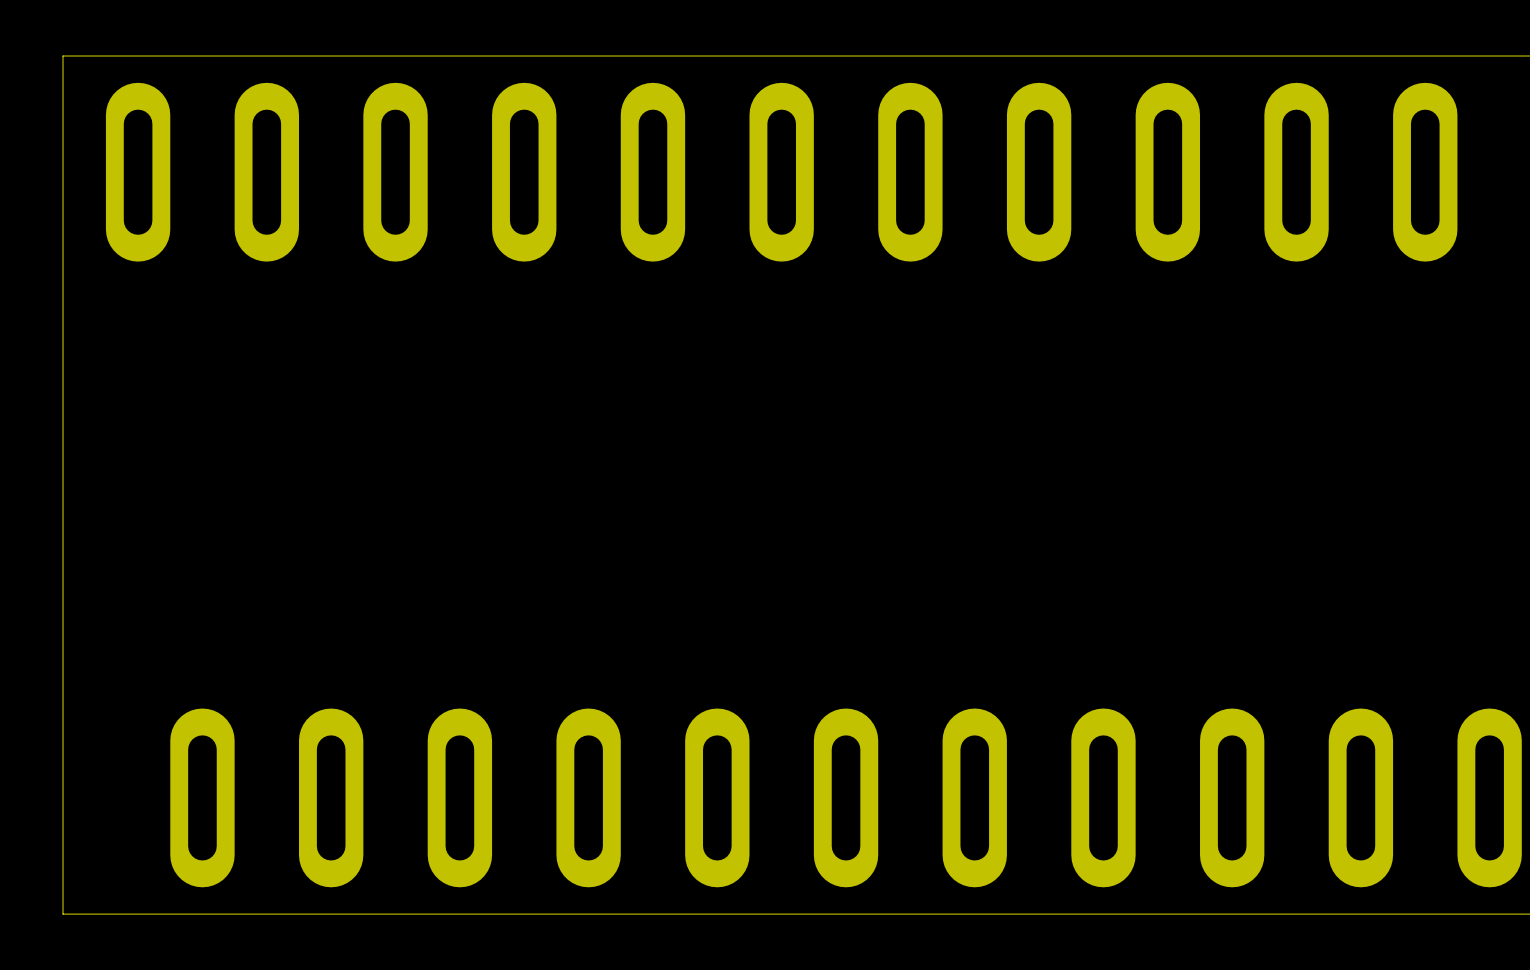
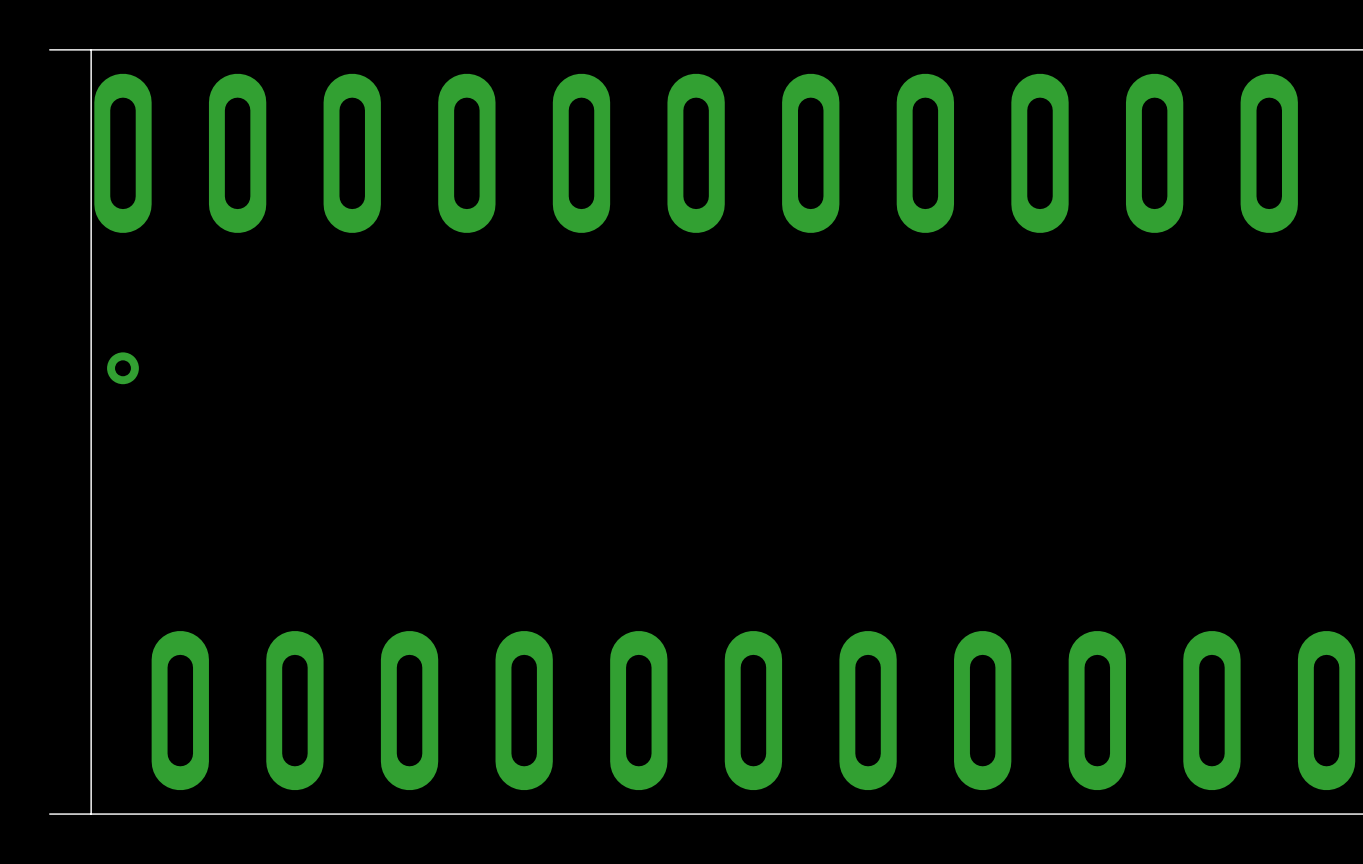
board edge: (63, 56) (63, 914) -> (56, 49) (49, 49)
board edge: none -> (91, 49) (91, 814)
part: none -> (122, 368)
board edge: none -> (56, 814) (49, 814)

